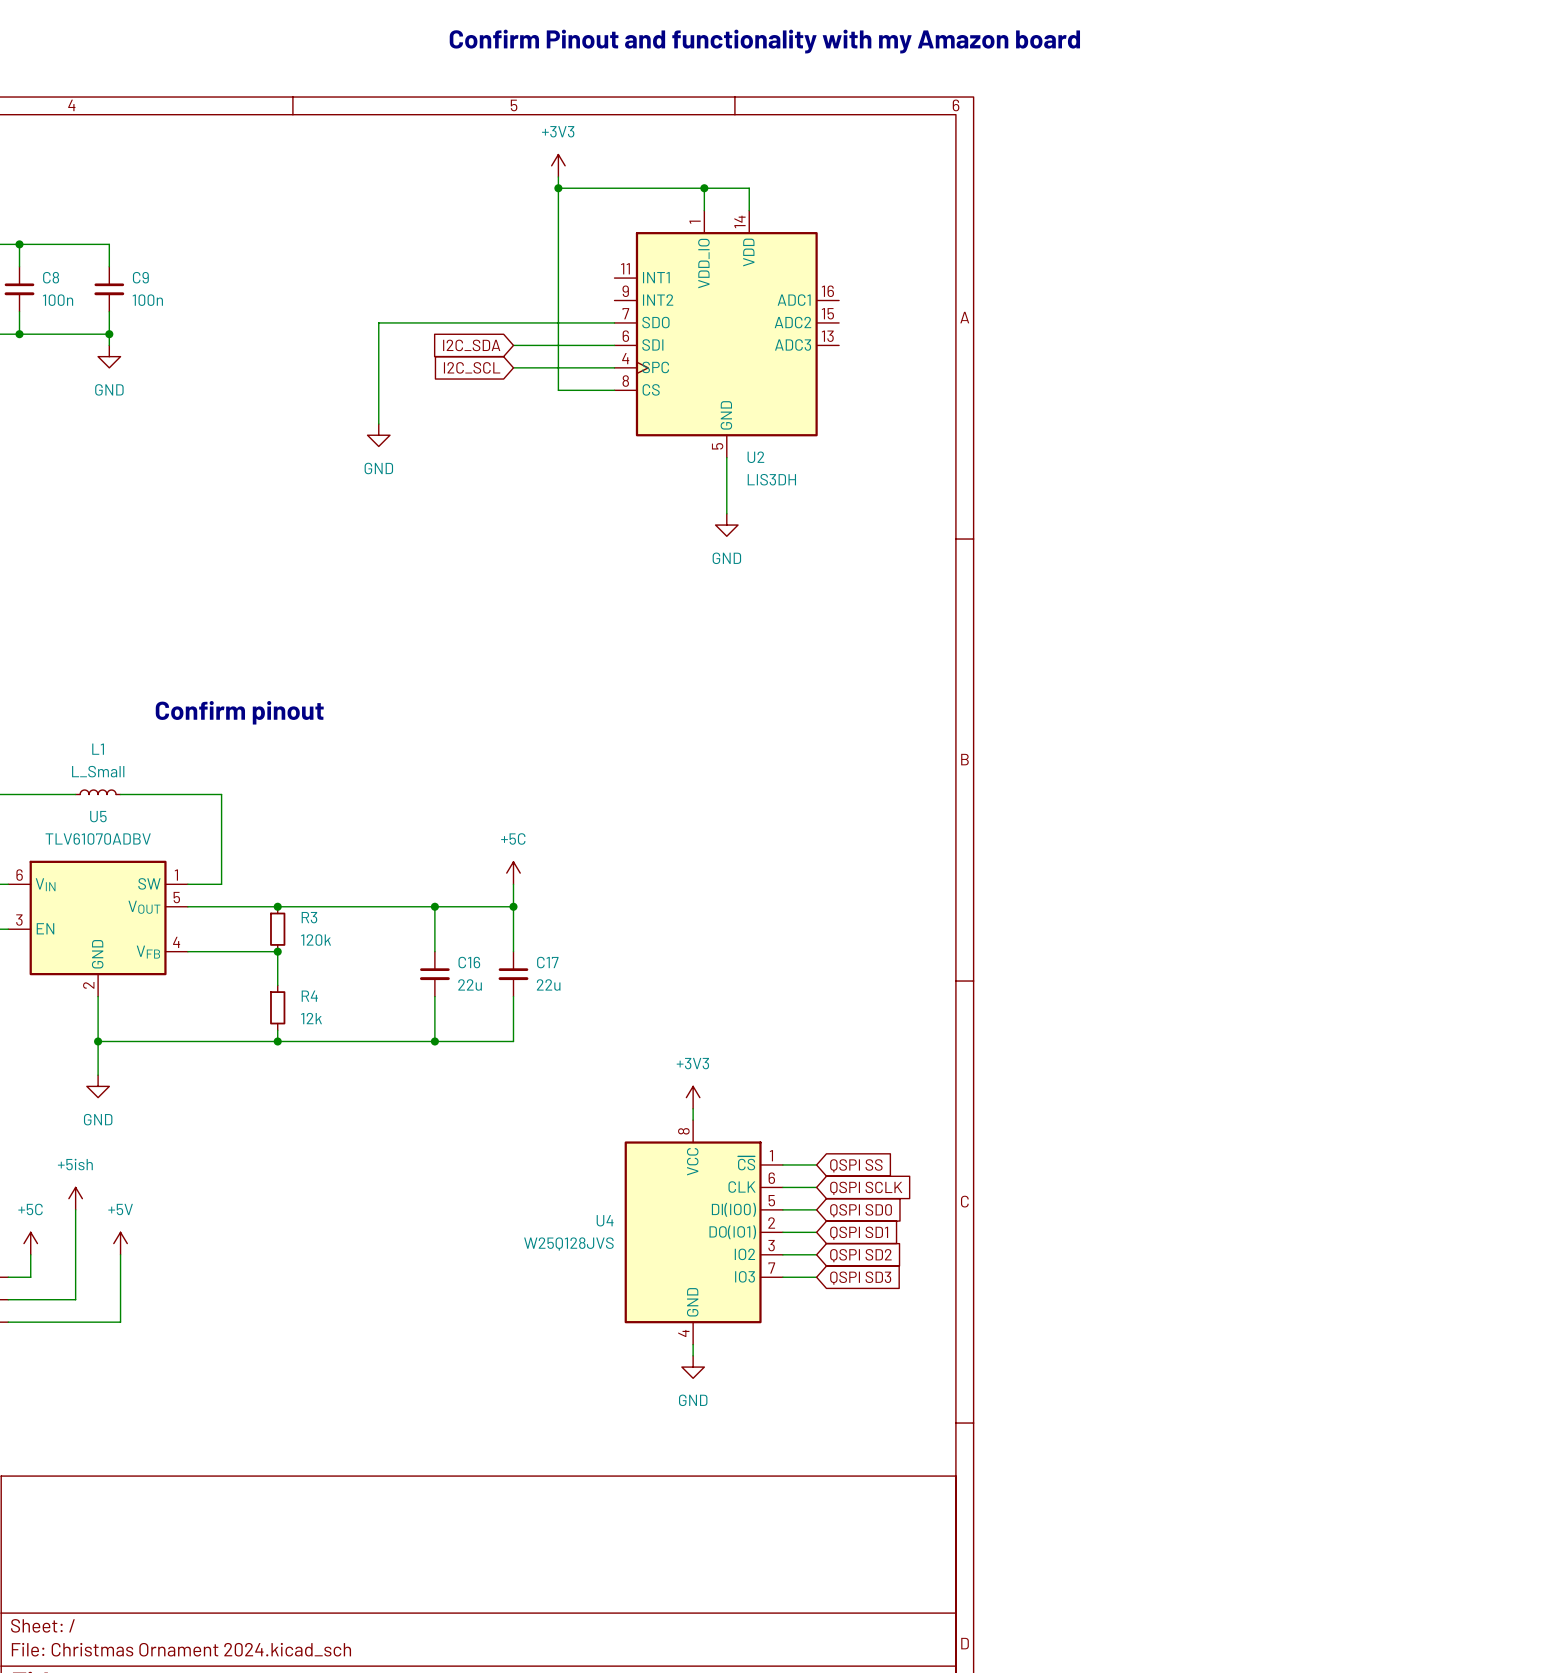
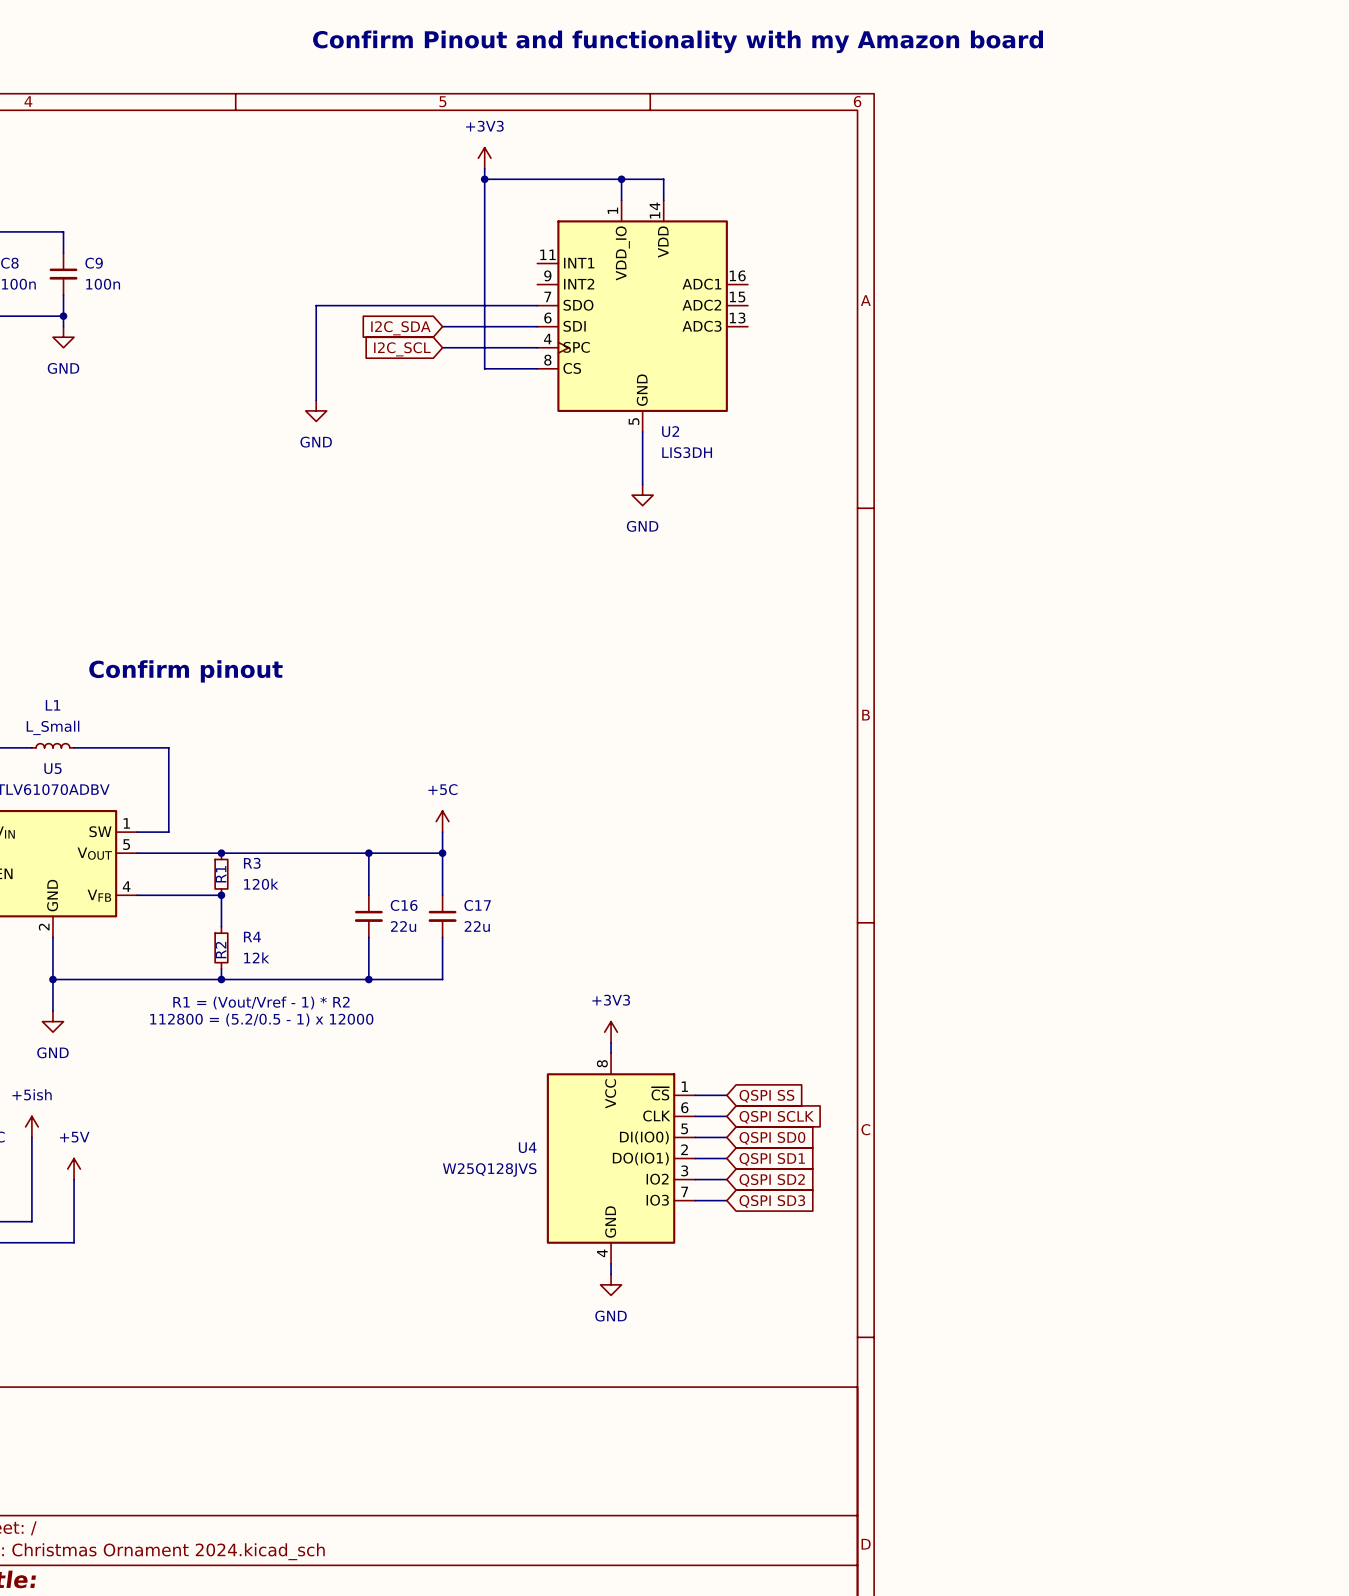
text: none -> R1 (221, 874)
text: none -> R2 (220, 950)
text: none -> R1 = (Vout/Vref - 1) * R2 (261, 1003)
text: none -> 112800 = (5.2/0.5 - 1) x 12000 (261, 1019)

